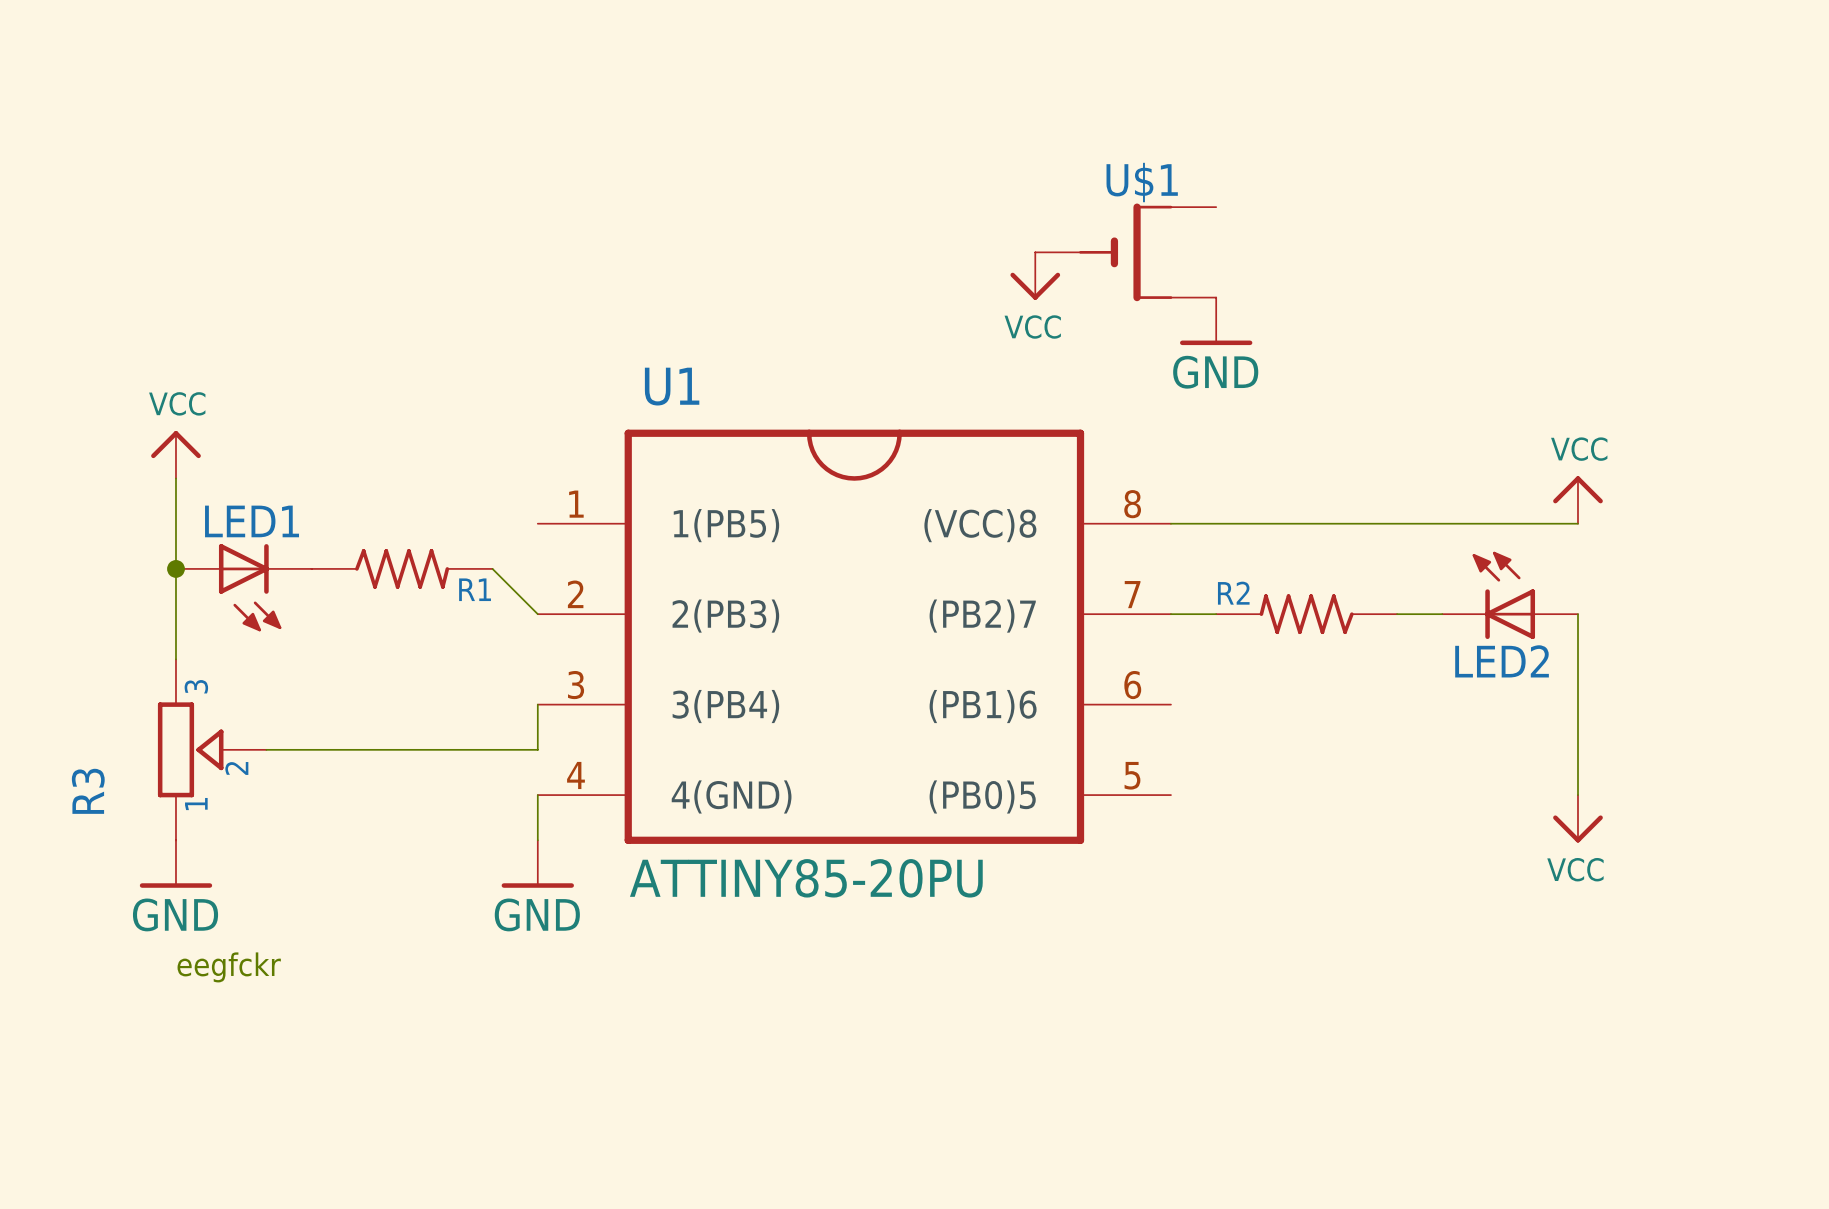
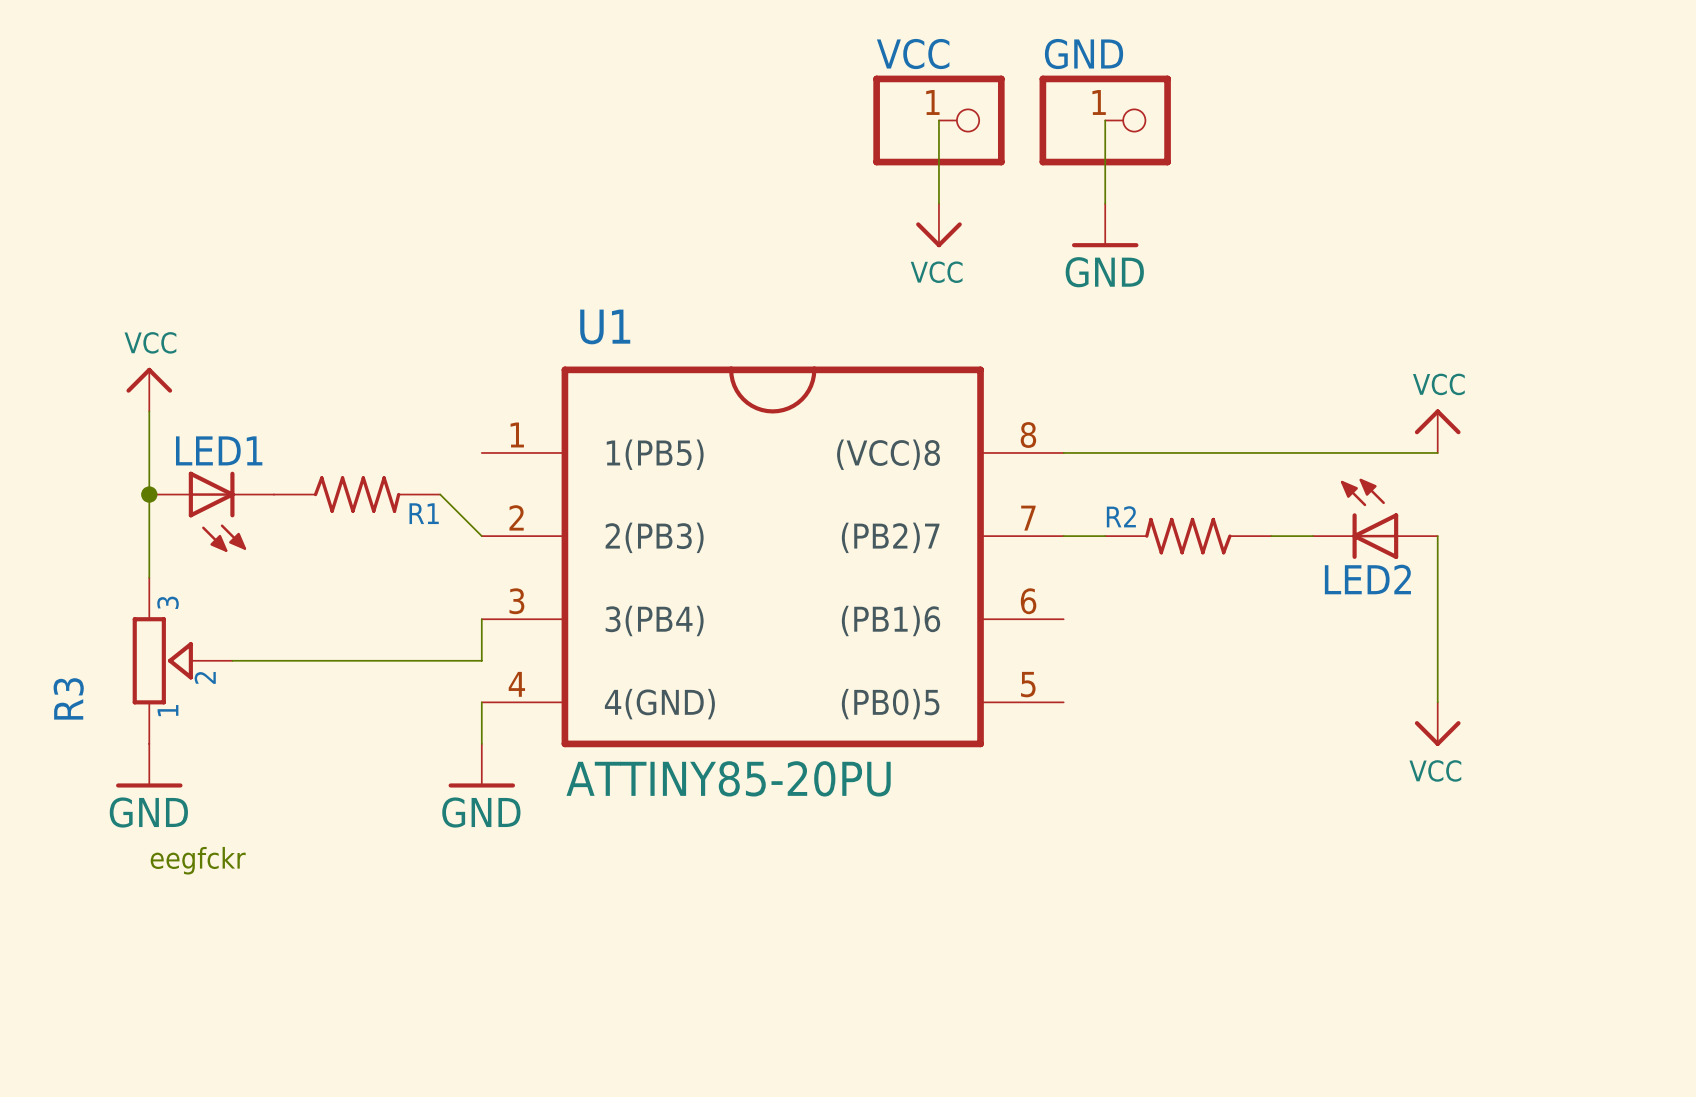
wire: none -> (938, 120) (938, 203)
VCC: none -> (938, 120)
wire: none -> (1105, 120) (1105, 203)
GND: none -> (1105, 120)
U$1: (1125, 252) -> none
power symbol position: GND (1216, 321) -> GND (1105, 225)

